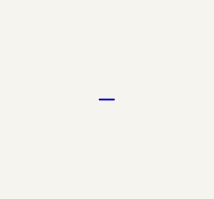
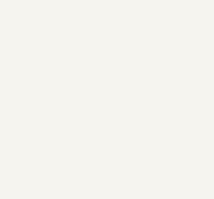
line: (99, 99) (114, 99) -> none

